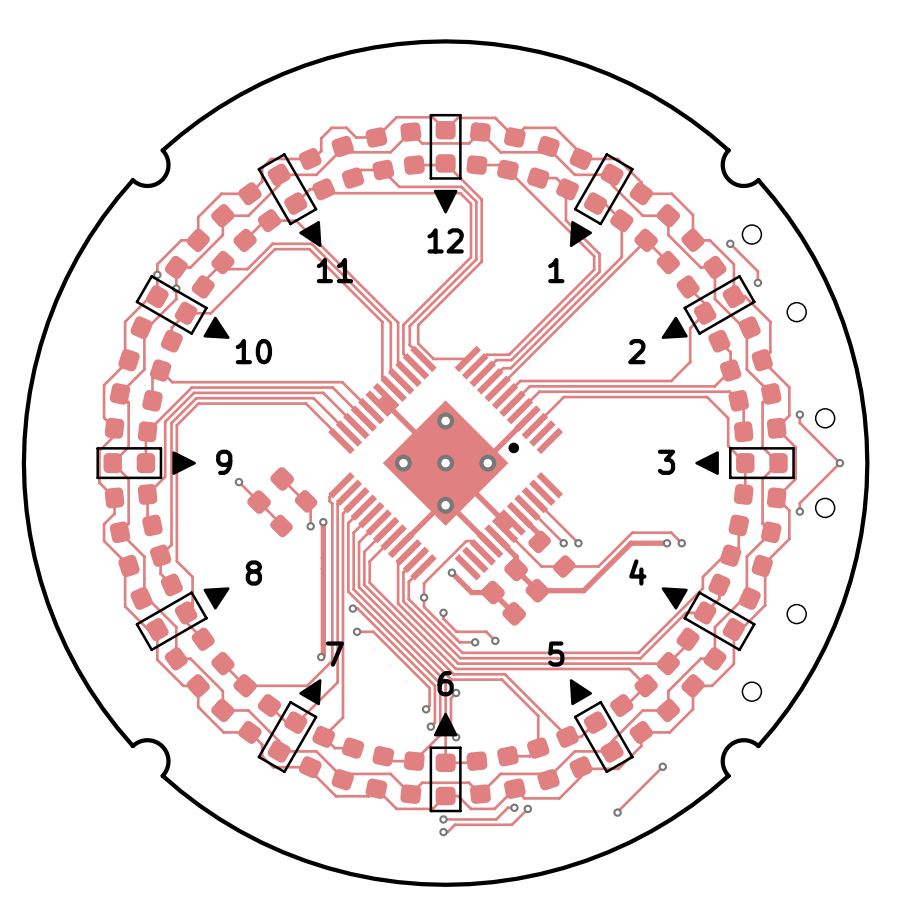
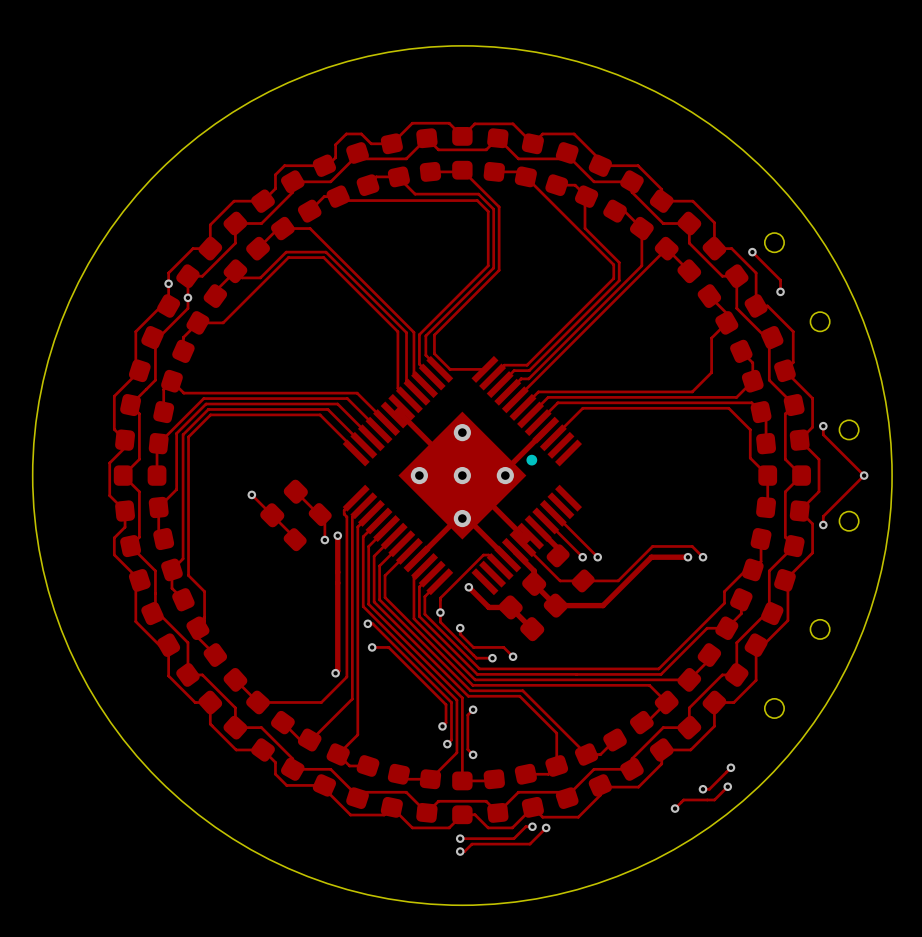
round board edge: none -> [32, 45, 893, 906]
line: (430, 115) (460, 115) (460, 178) (430, 178) (430, 115) -> none
board edge: (162, 150) (167, 157) (168, 165) (164, 177) (158, 183) (150, 185) (142, 185) (132, 180) (102, 217) (66, 278) (40, 345) (29, 391) (24, 439) (24, 486) (29, 534) (47, 603) (66, 647) (89, 689) (132, 746) (144, 740) (153, 740) (160, 744) (165, 750) (168, 758) (167, 766) (162, 775) (199, 805) (261, 842) (327, 868) (374, 878) (421, 884) (493, 882) (540, 874) (586, 860) (651, 831) (691, 805) (728, 775) (722, 763) (723, 755) (727, 748) (733, 743) (740, 740) (748, 740) (758, 746) (788, 708) (824, 647) (850, 580) (861, 534) (866, 486) (864, 415) (856, 368) (843, 322) (813, 257) (788, 217) (758, 180) (746, 185) (738, 185) (730, 181) (724, 173) (722, 165) (724, 157) (728, 150) (691, 120) (630, 83) (563, 58) (516, 47) (469, 42) (421, 42) (374, 47) (305, 65) (240, 94) (199, 120) (162, 150) -> none
line: (284, 154) (316, 209) (290, 223) (258, 169) (284, 154) -> none
line: (606, 154) (575, 209) (600, 223) (632, 169) (606, 154) -> none
drawing: [433, 189, 458, 214] -> none
drawing: [299, 221, 322, 248] -> none
drawing: [569, 221, 593, 248] -> none
text: 12 (445, 240) -> none
text: 11 (334, 270) -> none
text: 1 (556, 270) -> none
line: (151, 276) (206, 307) (191, 333) (136, 301) (151, 276) -> none
line: (739, 276) (684, 307) (699, 333) (754, 301) (739, 276) -> none
drawing: [203, 316, 230, 339] -> none
drawing: [661, 316, 688, 339] -> none
text: 10 (253, 351) -> none
text: 2 (636, 351) -> none
line: (97, 448) (97, 477) (160, 477) (160, 448) (97, 448) -> none
line: (730, 448) (793, 448) (793, 477) (730, 477) (730, 448) -> none
drawing: [172, 451, 196, 475] -> none
drawing: [695, 451, 719, 475] -> none
text: 9 (224, 462) -> none
text: 3 (666, 462) -> none
text: 4 (637, 572) -> none
text: 8 (253, 573) -> none
drawing: [203, 587, 230, 610] -> none
drawing: [661, 587, 688, 610] -> none
line: (191, 592) (136, 624) (151, 649) (206, 618) (191, 592) -> none
line: (699, 592) (754, 624) (739, 649) (684, 618) (699, 592) -> none
text: 7 (334, 654) -> none
text: 5 (556, 654) -> none
drawing: [299, 679, 322, 706] -> none
drawing: [569, 679, 593, 706] -> none
text: 6 (445, 683) -> none
line: (290, 702) (258, 757) (284, 771) (316, 717) (290, 702) -> none
line: (600, 702) (632, 757) (606, 771) (575, 717) (600, 702) -> none
drawing: [433, 712, 458, 737] -> none
line: (430, 747) (430, 811) (460, 811) (460, 747) (430, 747) -> none
track: none -> (730, 767) (709, 789) (703, 789)
via: none -> (730, 767)
track: (662, 766) (617, 812) -> none
via: (662, 766) -> none
track: none -> (727, 786) (714, 799) (683, 799) (675, 808)
via: none -> (727, 786)
via: none -> (703, 789)
via: none -> (675, 808)
via: (617, 812) -> none

